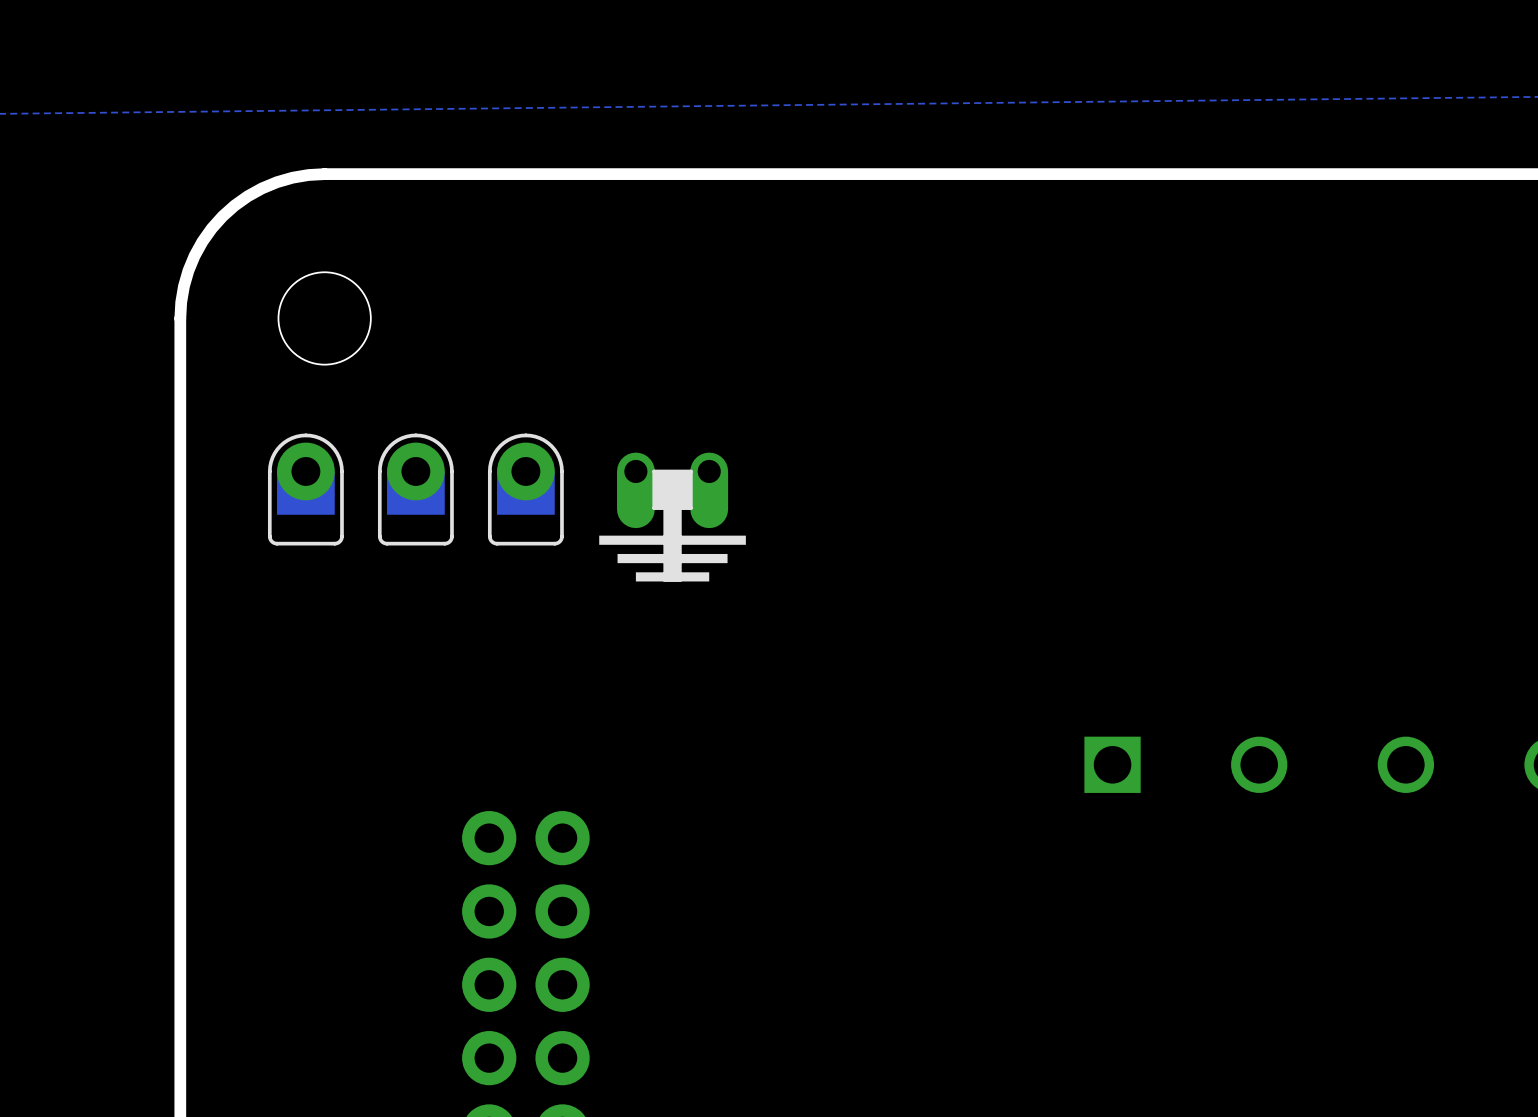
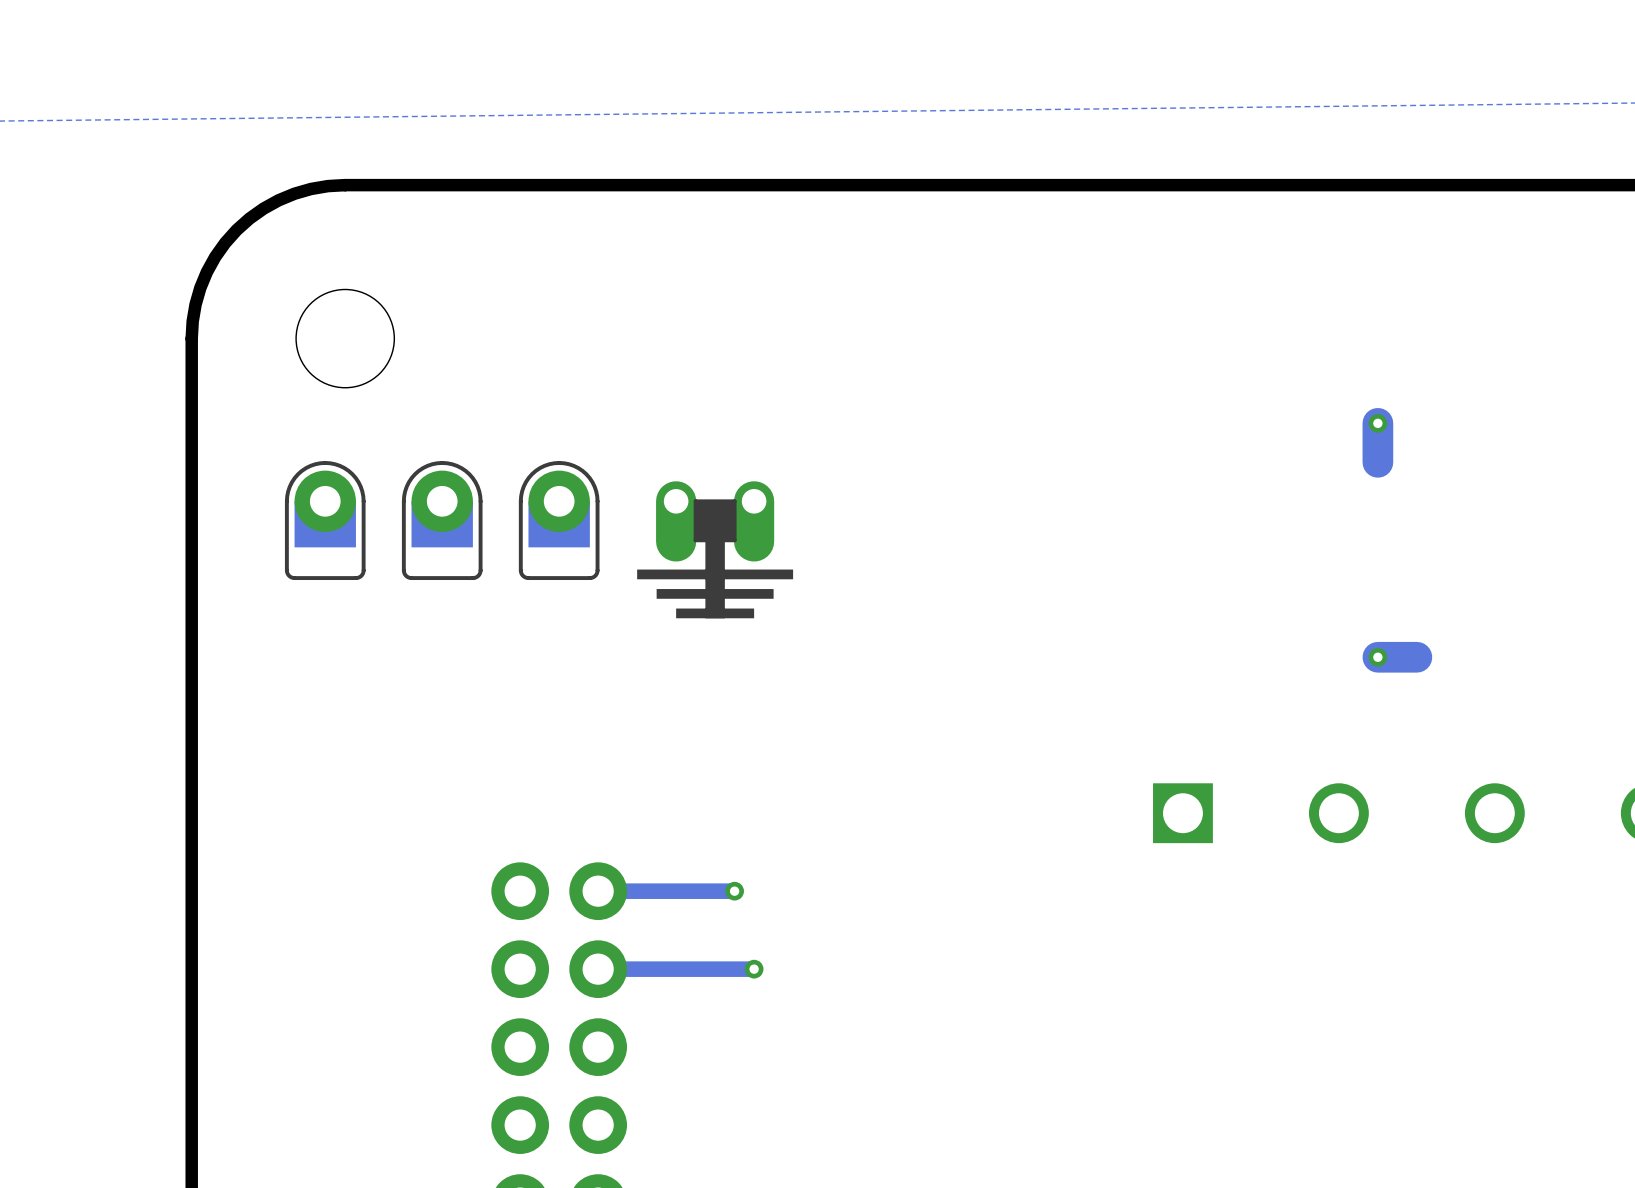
track: none -> (1377, 423) (1377, 462)
via: none -> (1377, 423)
via: none -> (1377, 657)
track: none -> (1416, 657) (1377, 657)
track: none -> (734, 891) (598, 891)
via: none -> (734, 891)
track: none -> (754, 969) (598, 969)
via: none -> (754, 969)

